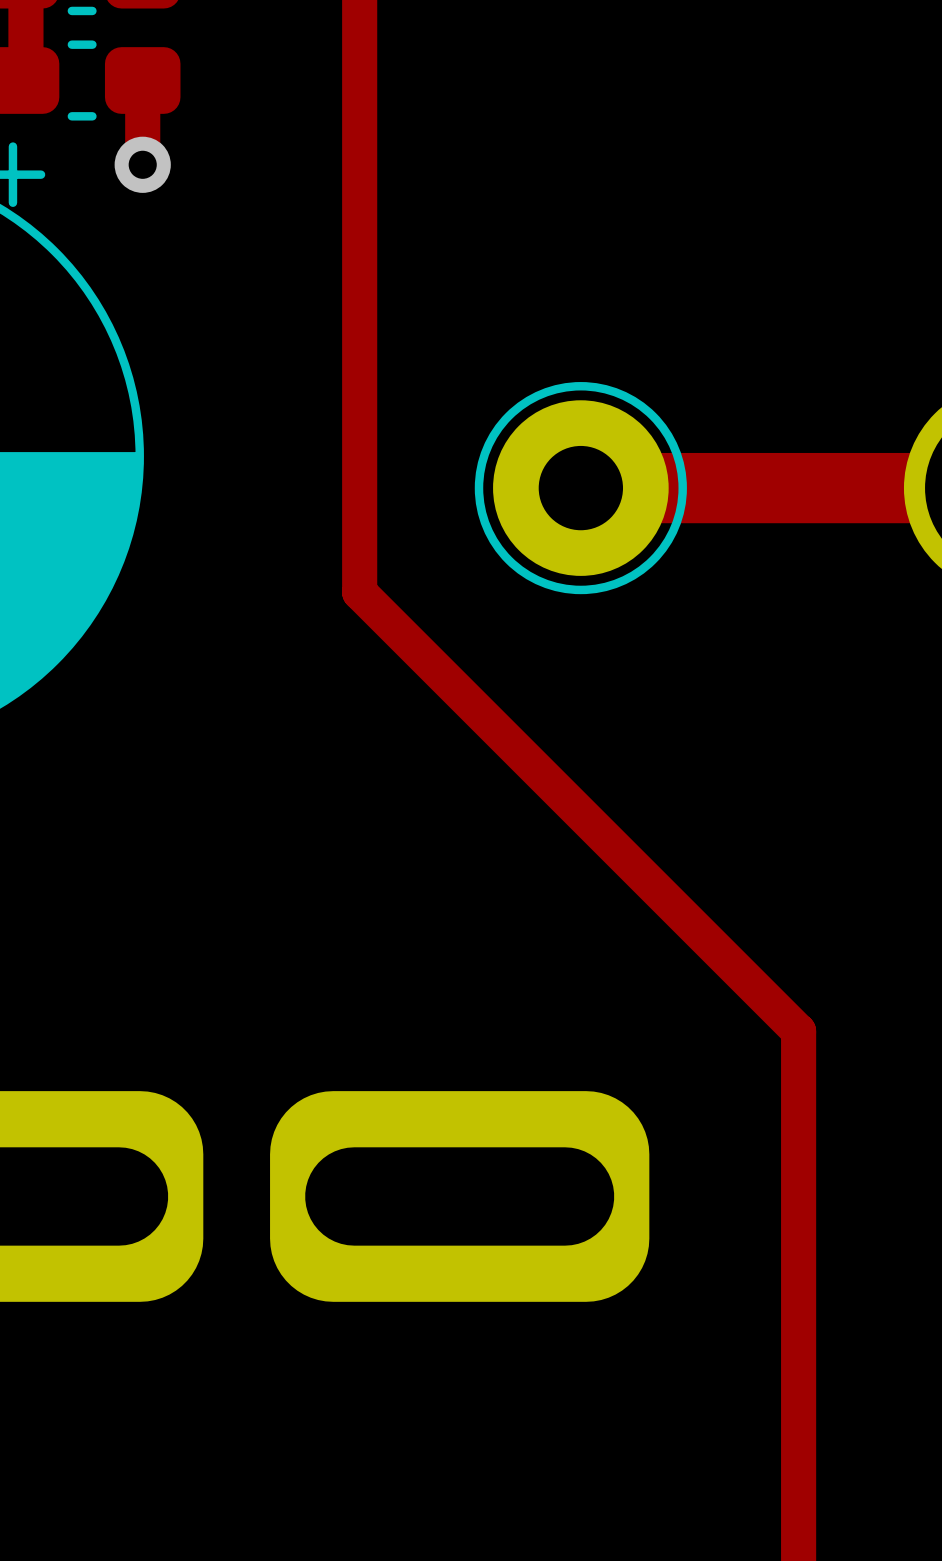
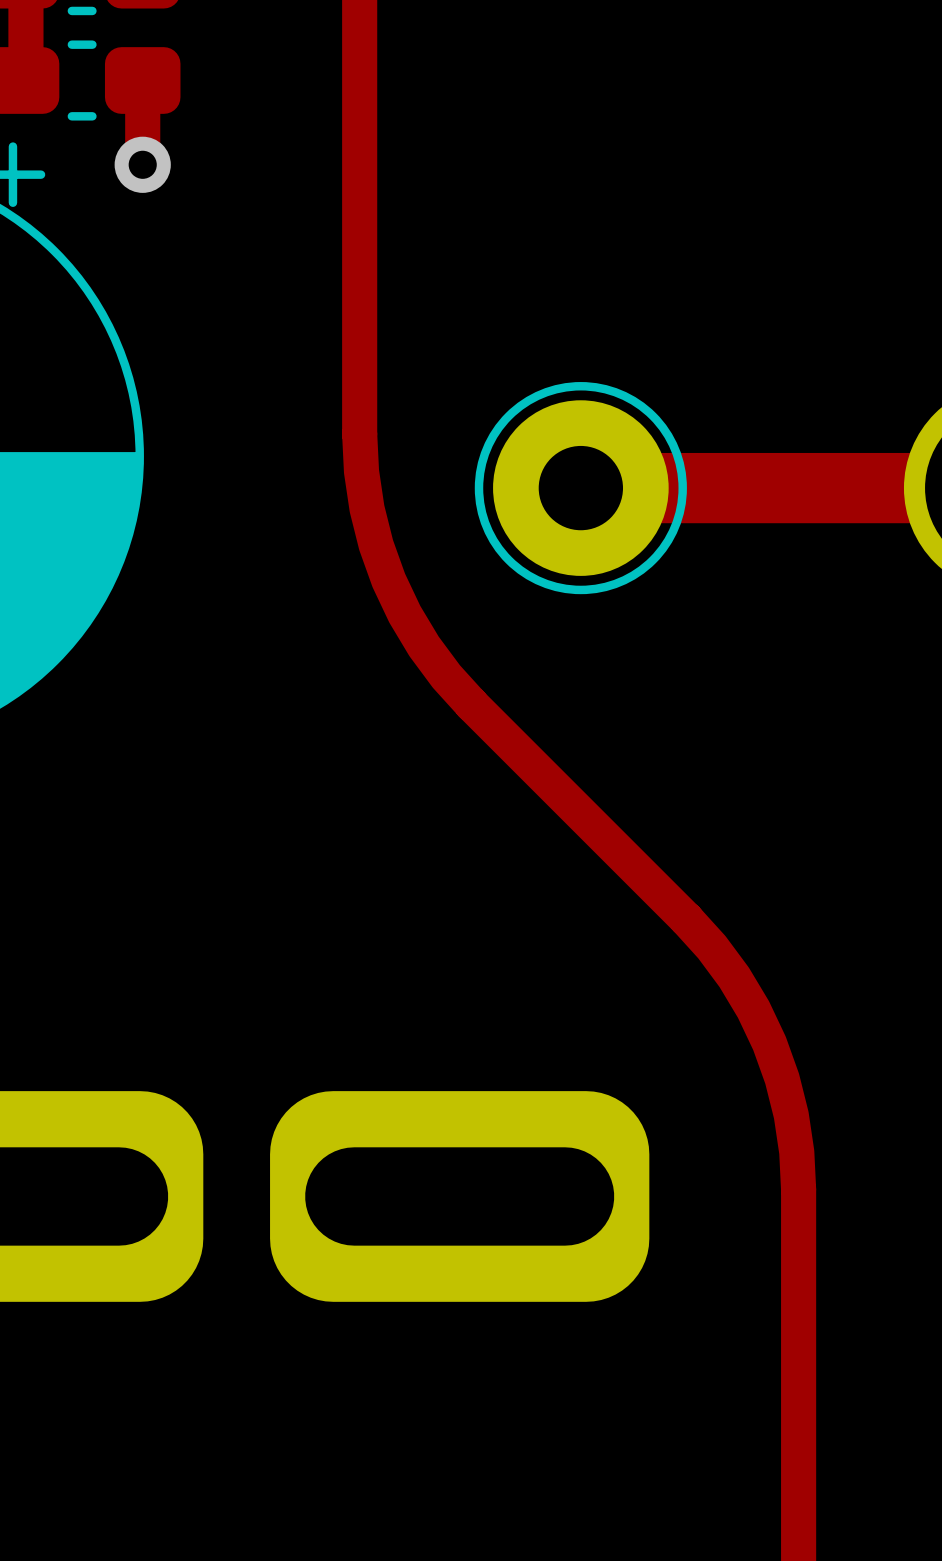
track: (359, 434) (359, 592) (471, 704) -> (359, 434) (361, 471) (367, 508) (376, 545) (388, 580) (404, 614) (424, 646) (446, 676) (471, 704)
track: (686, 919) (798, 1031) (798, 1189) -> (686, 919) (711, 947) (734, 977) (753, 1009) (769, 1043) (782, 1078) (791, 1115) (796, 1152) (798, 1189)

